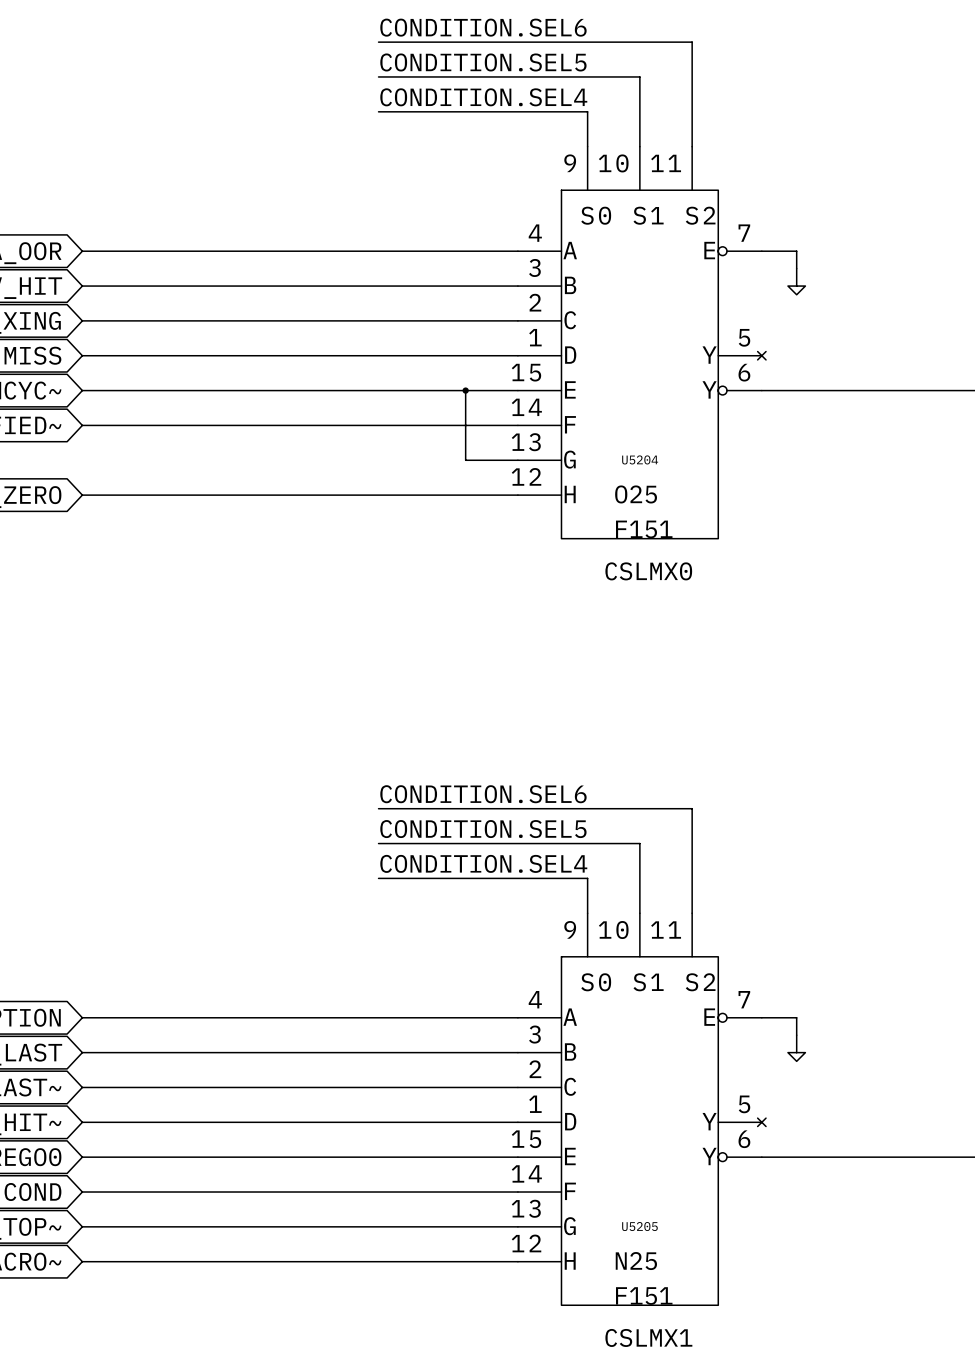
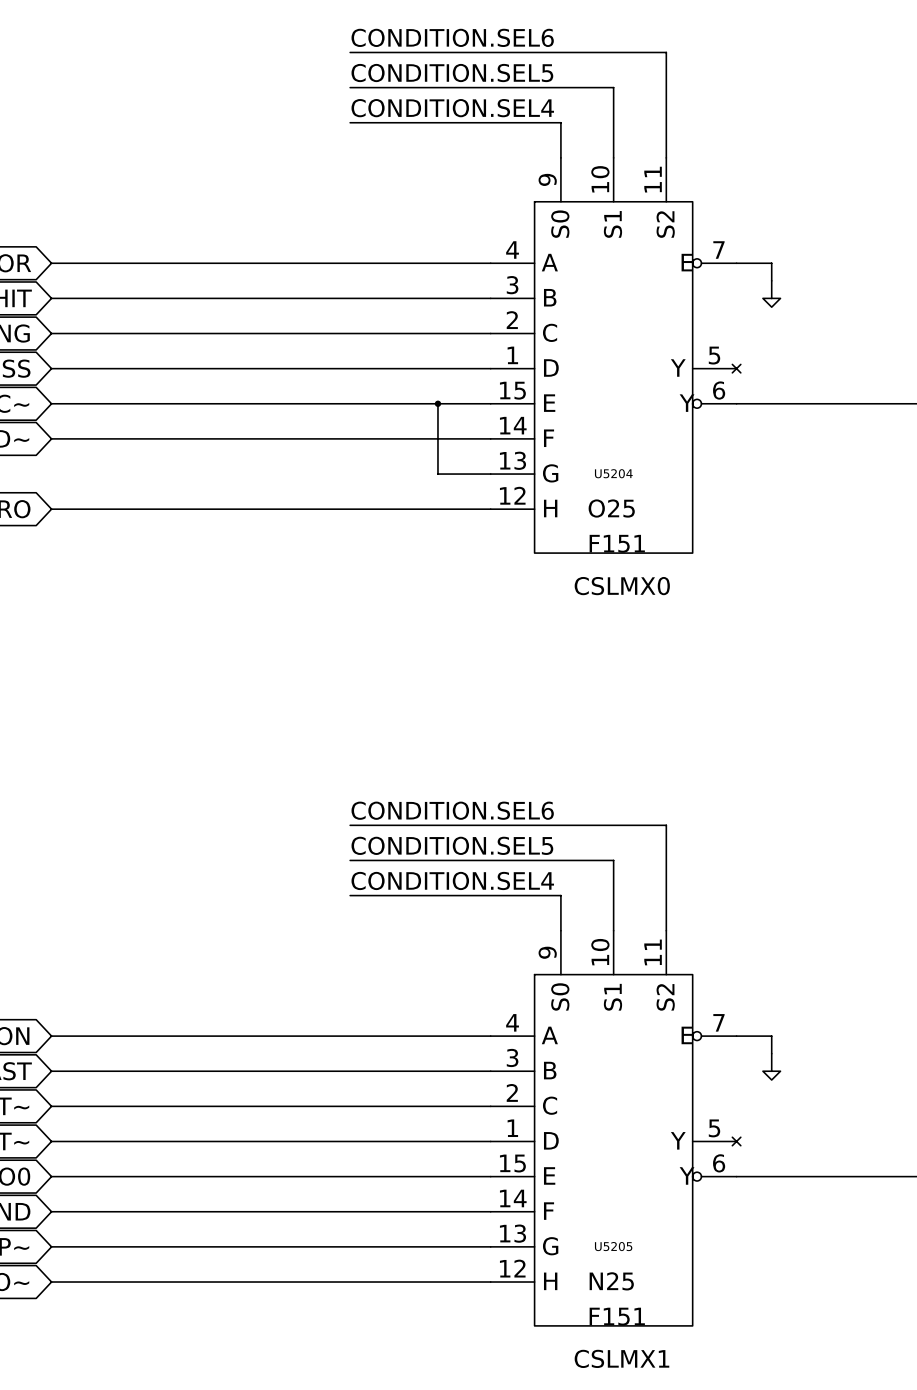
U5204 symbol: [517, 146, 762, 539] -> [490, 157, 737, 554]
U5205 symbol: [517, 913, 762, 1306] -> [490, 930, 737, 1326]

